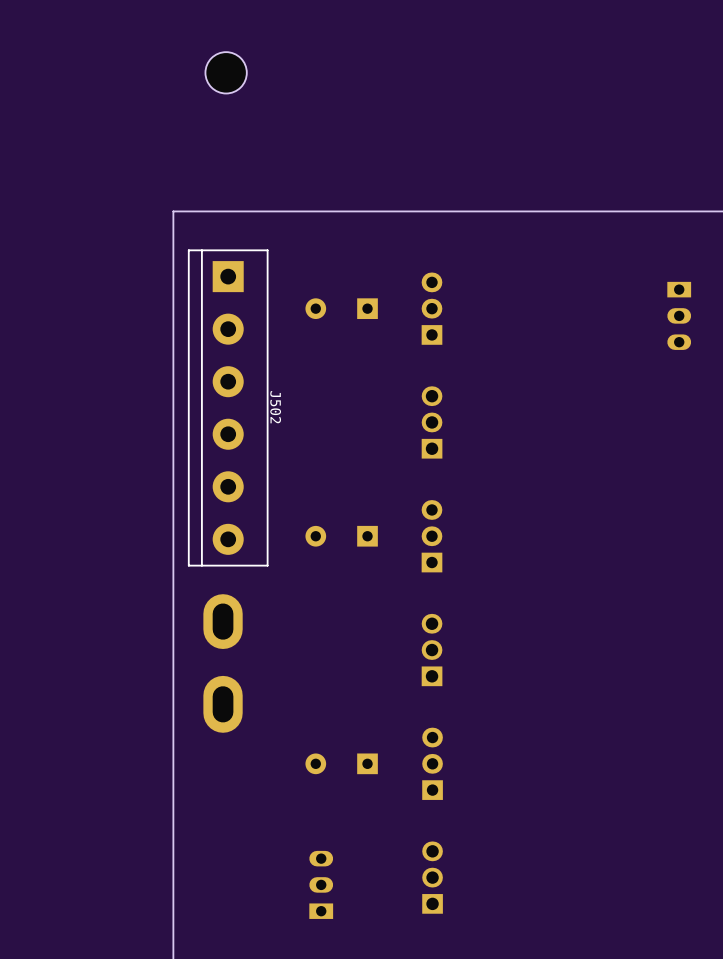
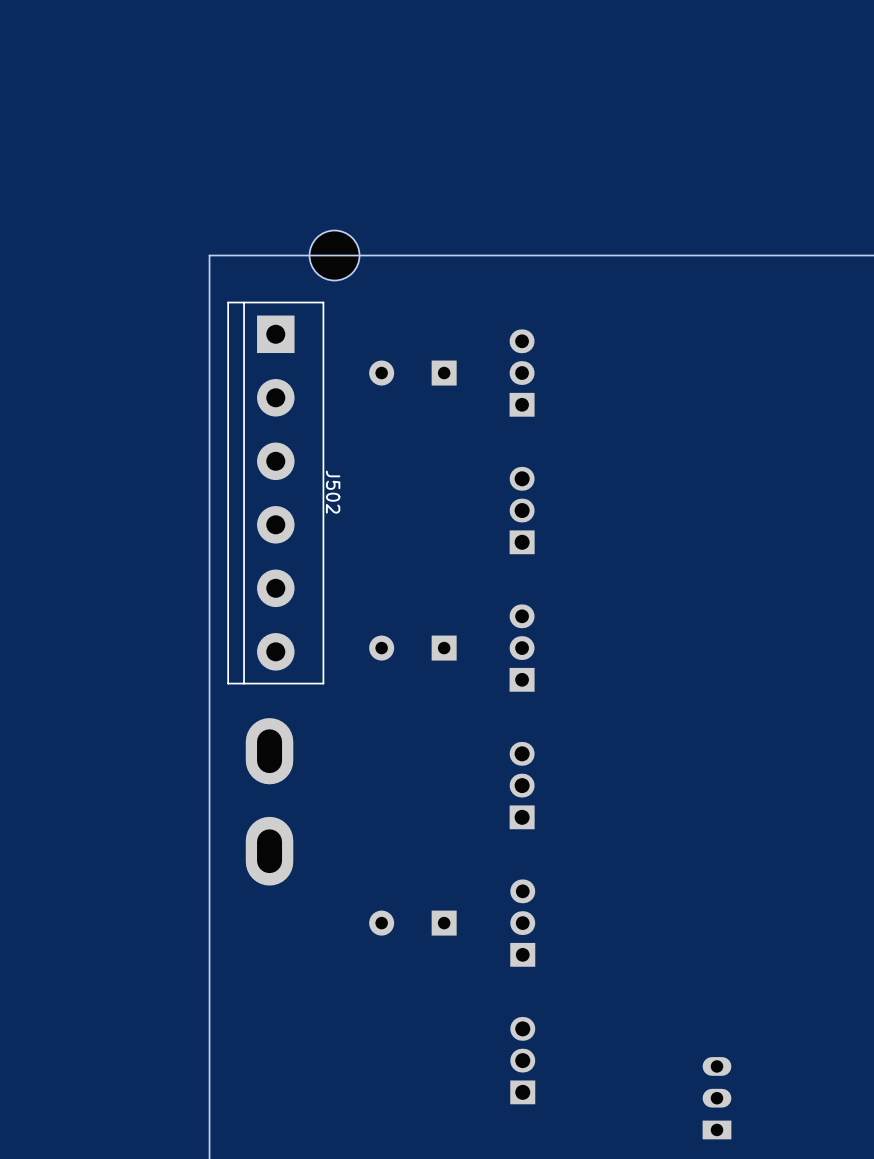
part position: (226, 72) -> (334, 255)
part: (679, 315) -> none
part: (321, 884) -> none
part: none -> (717, 1098)

